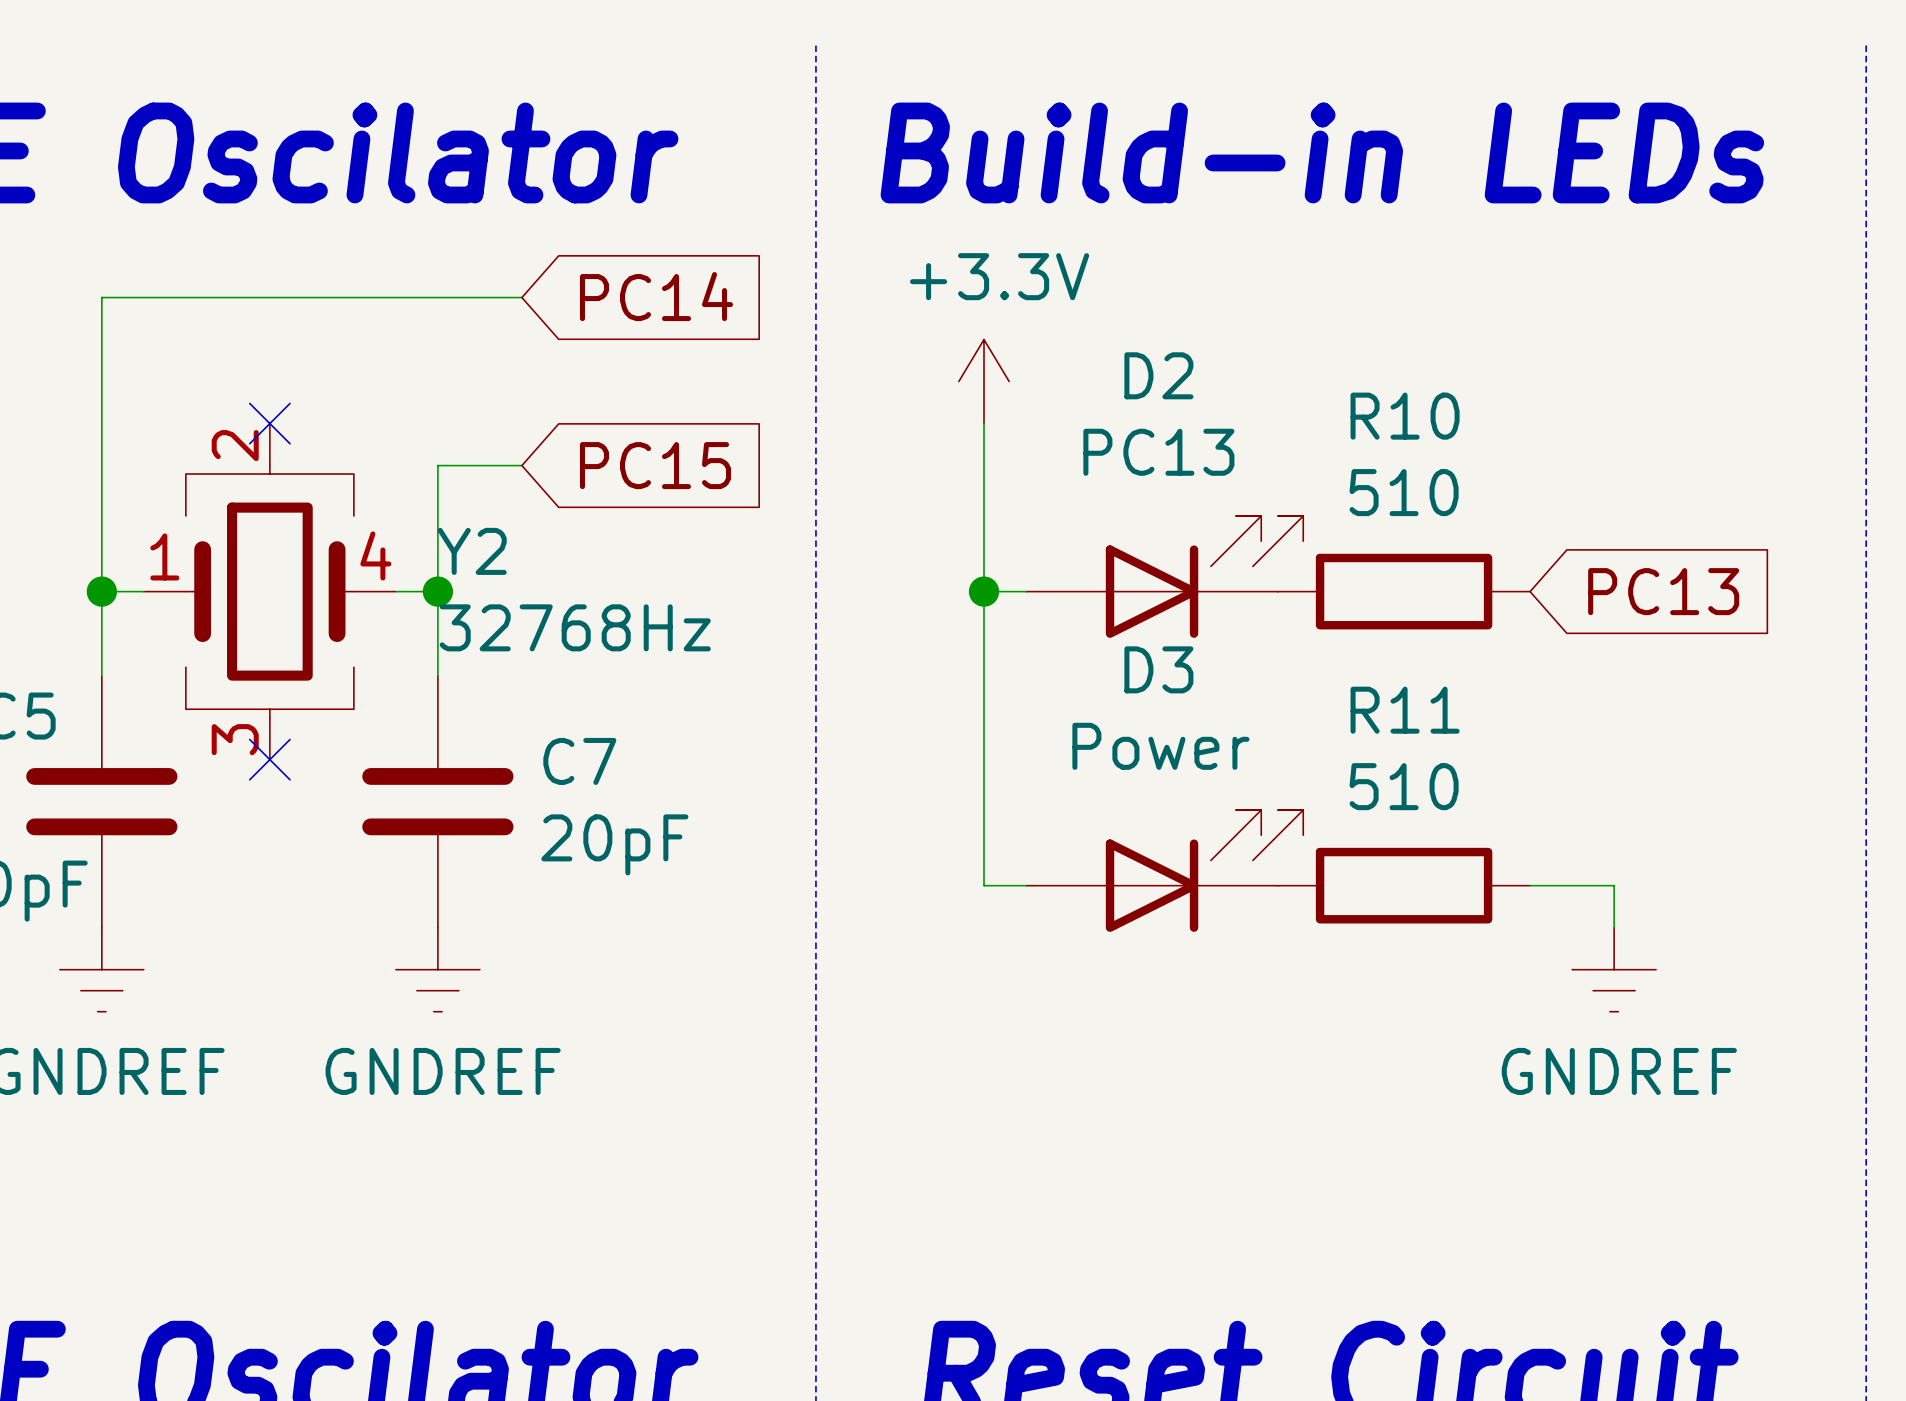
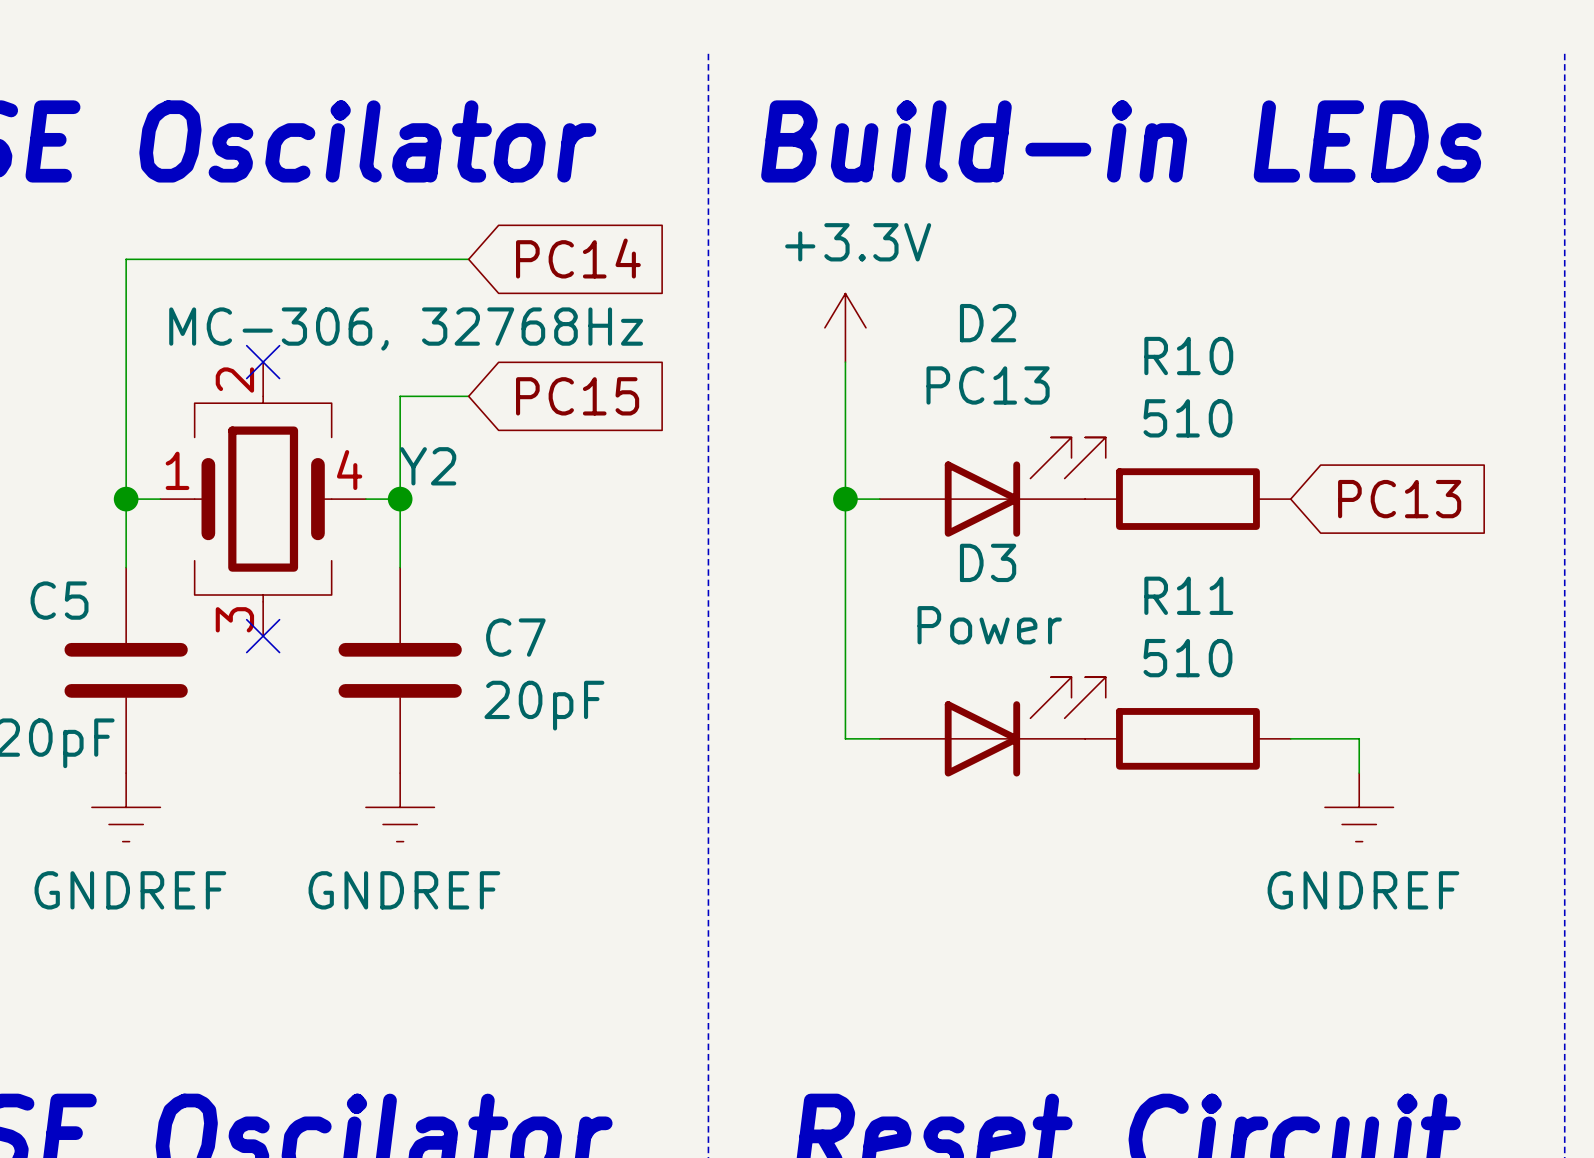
Y2 value: 32768Hz (575, 627) -> MC-306, 32768Hz (406, 329)

